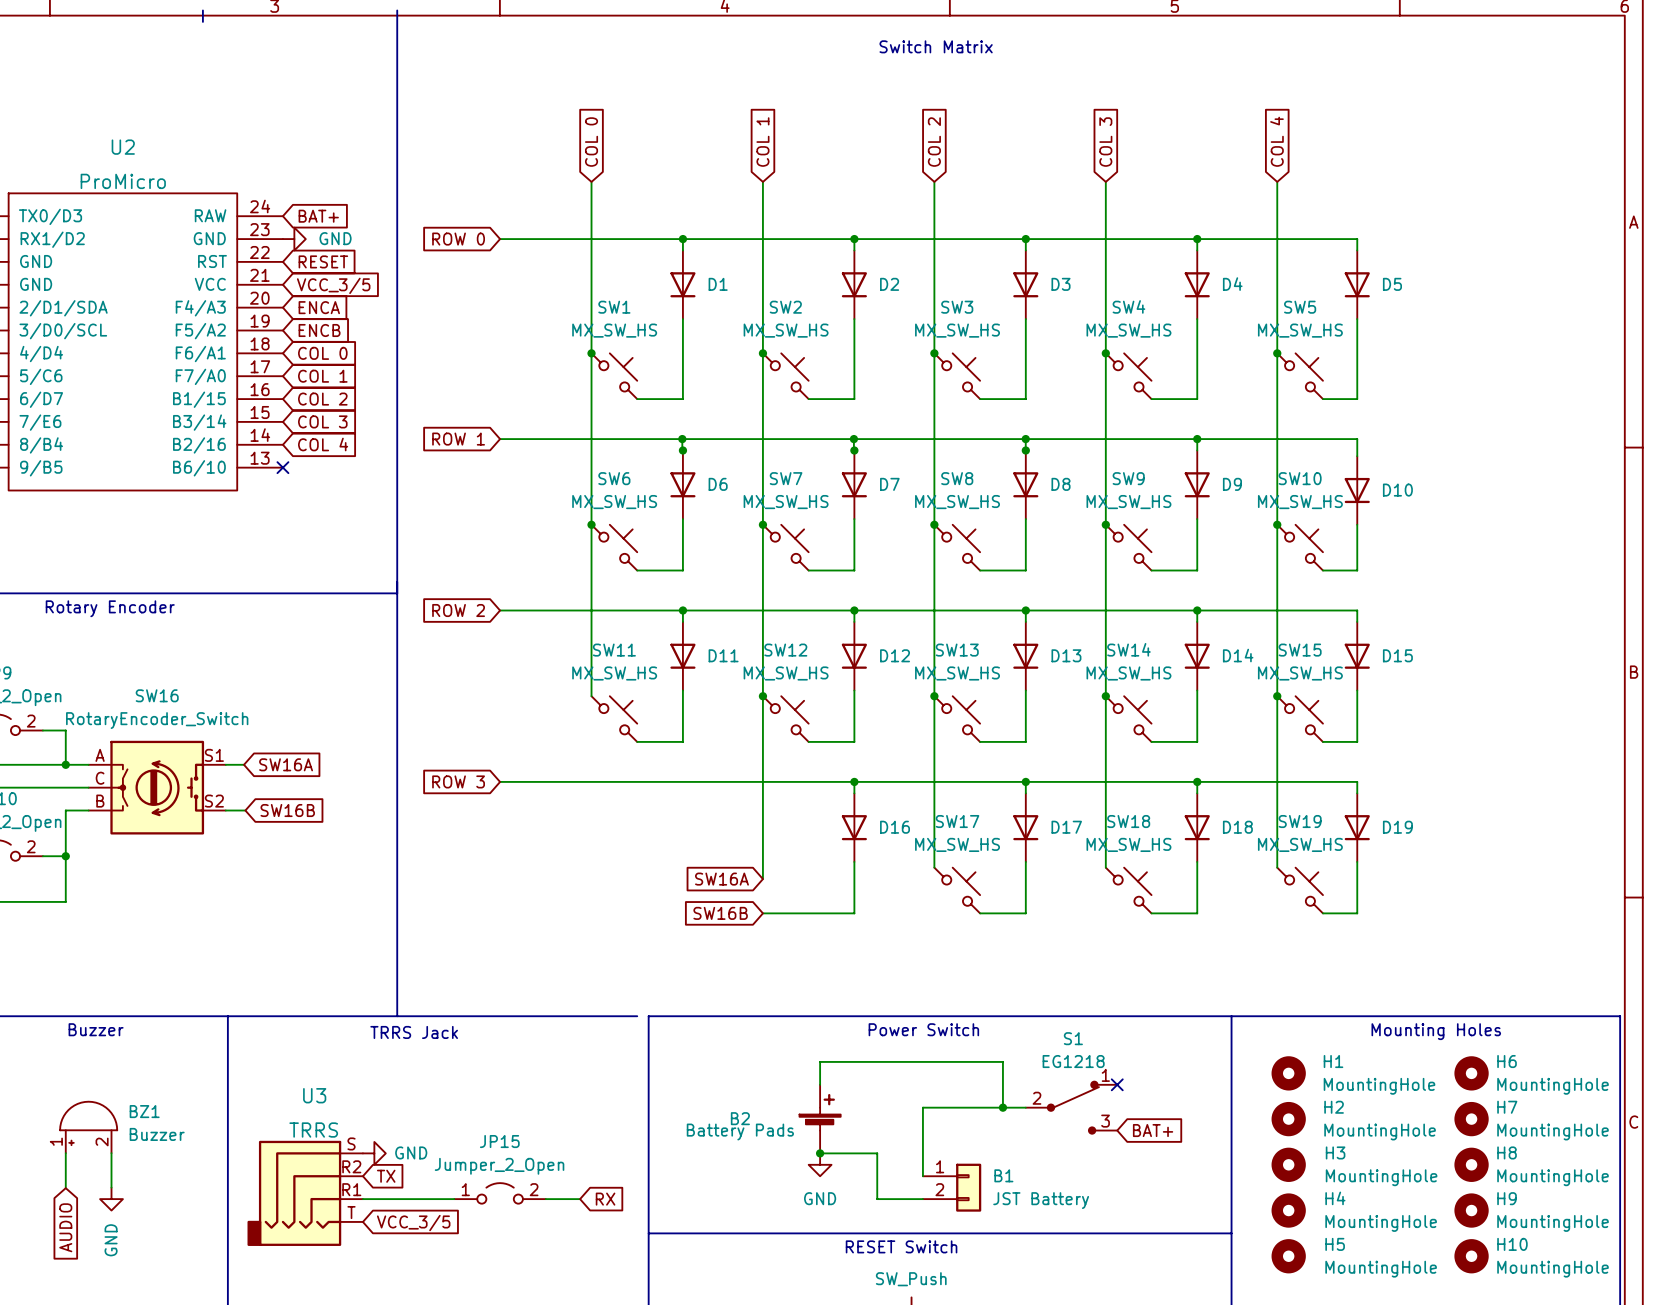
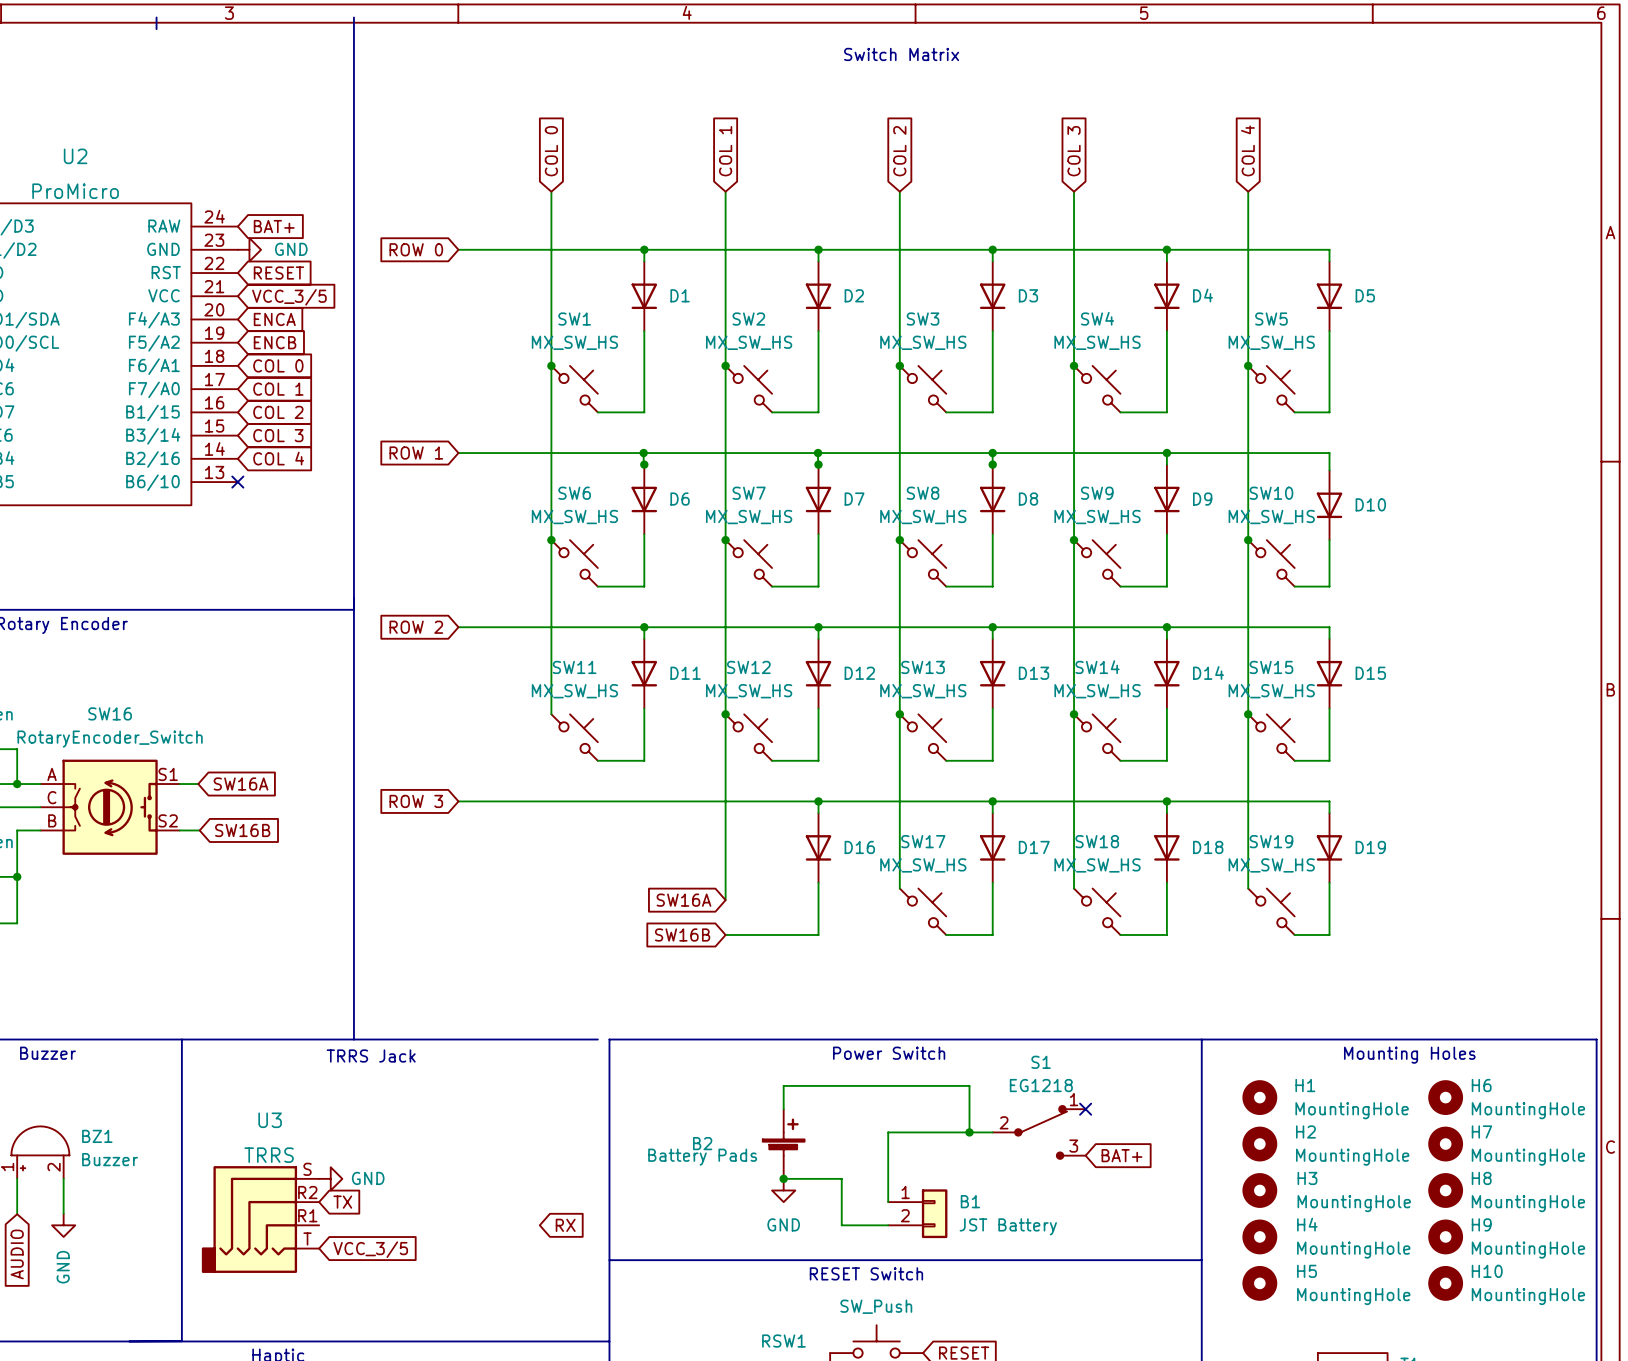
JP15: Jumper_2_Open (500, 1193) -> none
wire: (362, 1199) (454, 1199) -> none
wire: (545, 1199) (580, 1199) -> none

